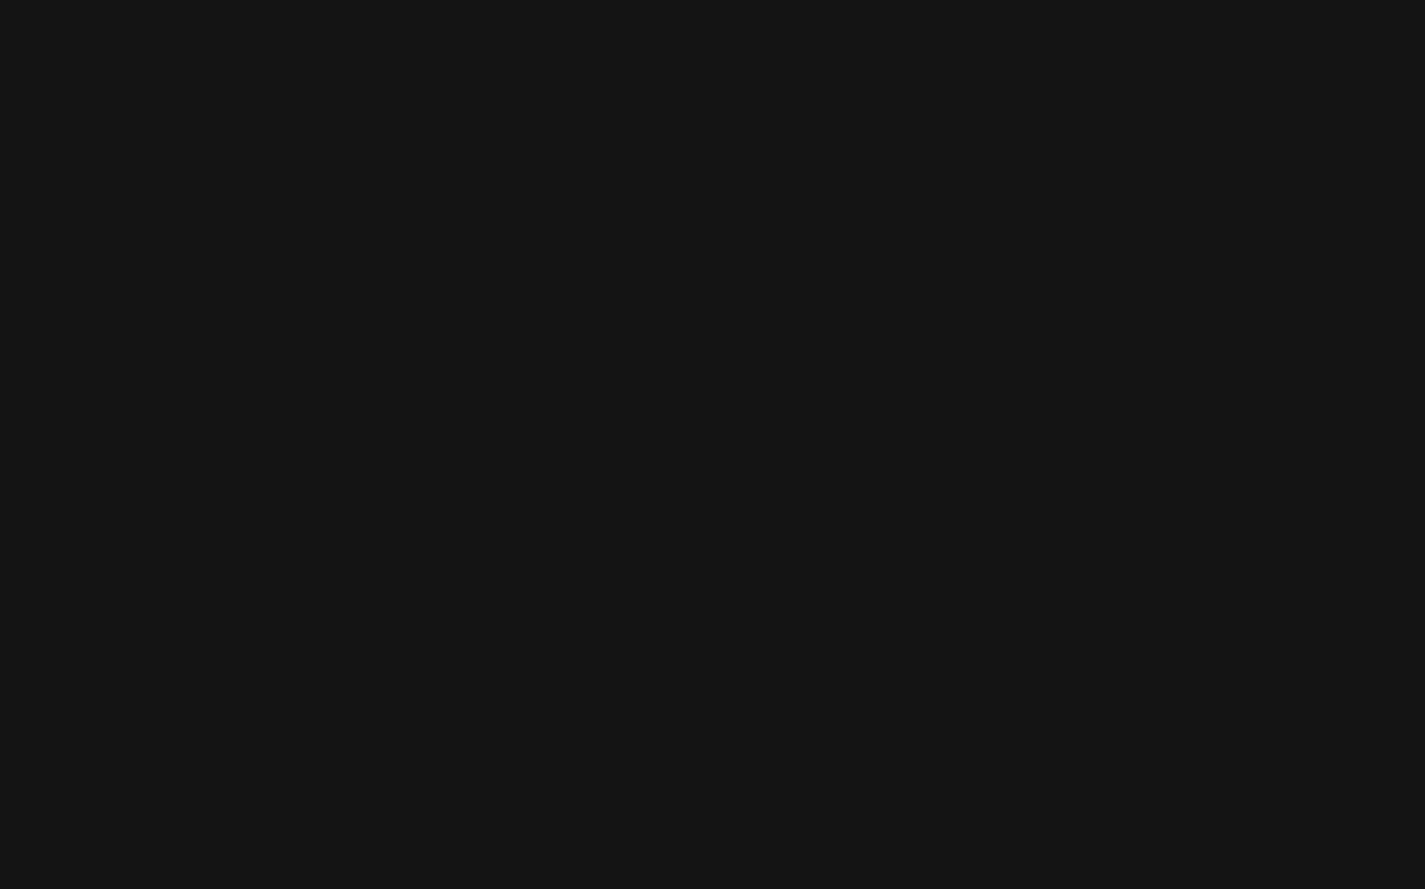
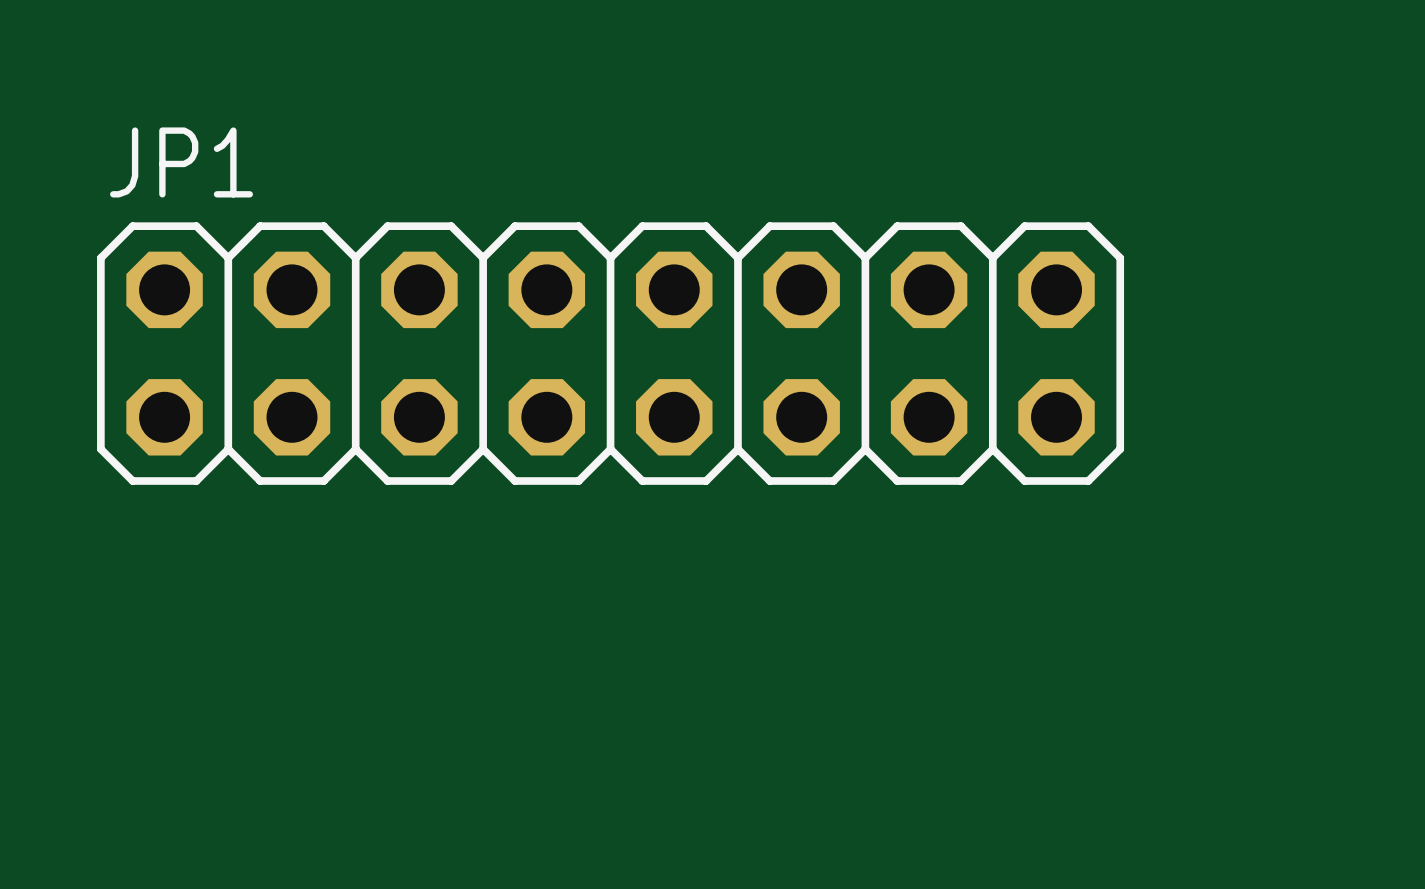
JP1: none -> (610, 353)

